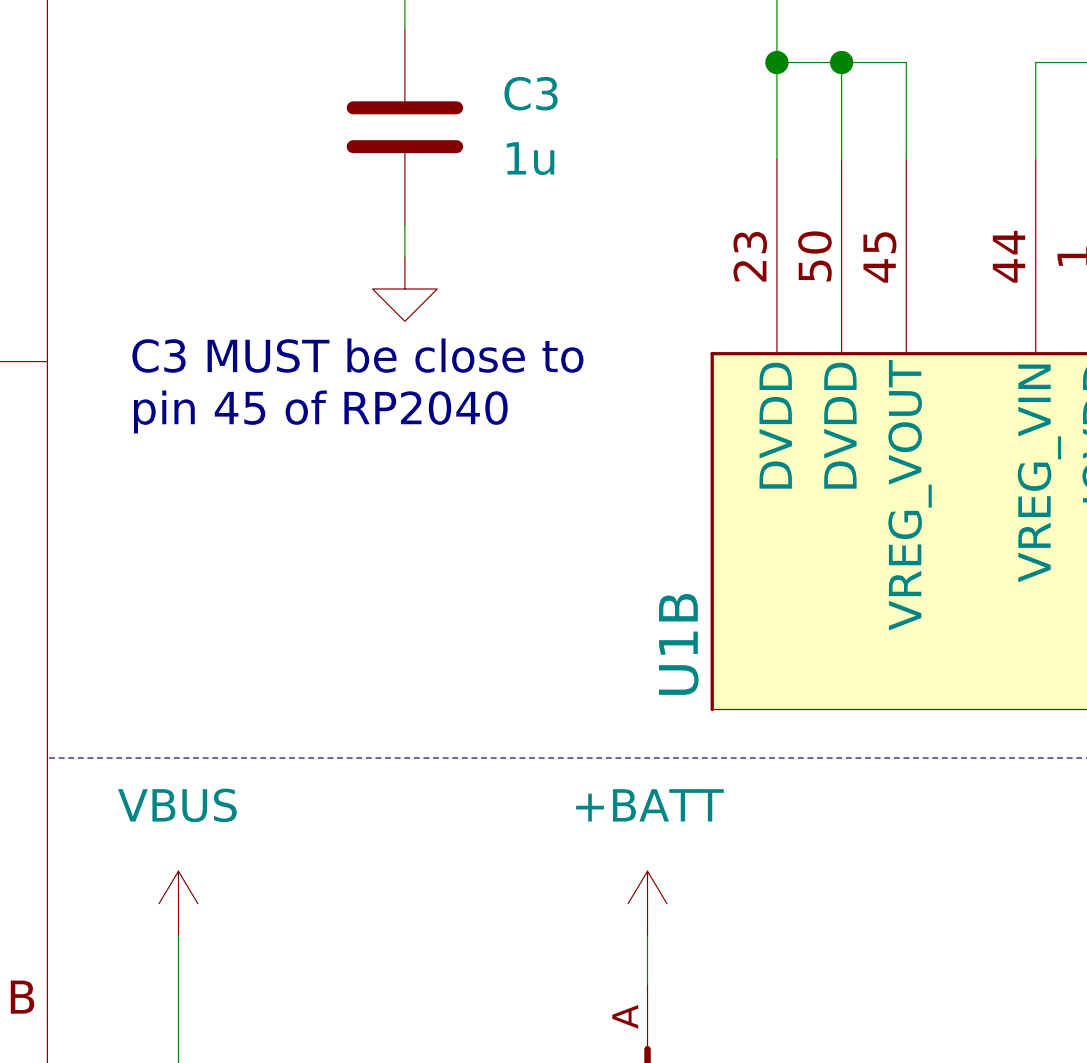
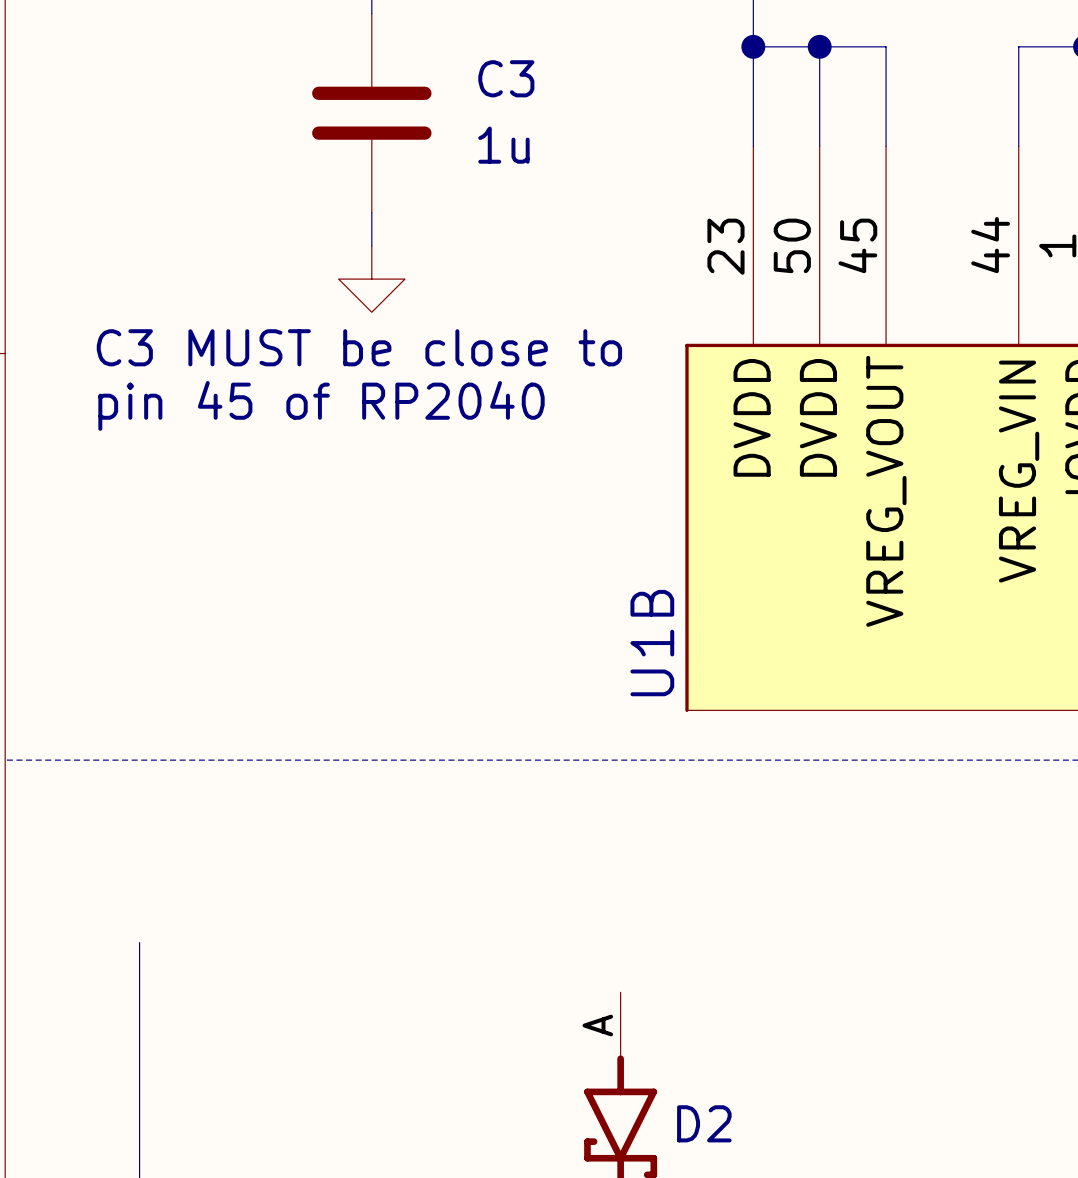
power symbol: VBUS (178, 903) -> none
power symbol: +BATT (647, 903) -> none
wire: (647, 935) (647, 984) -> none

